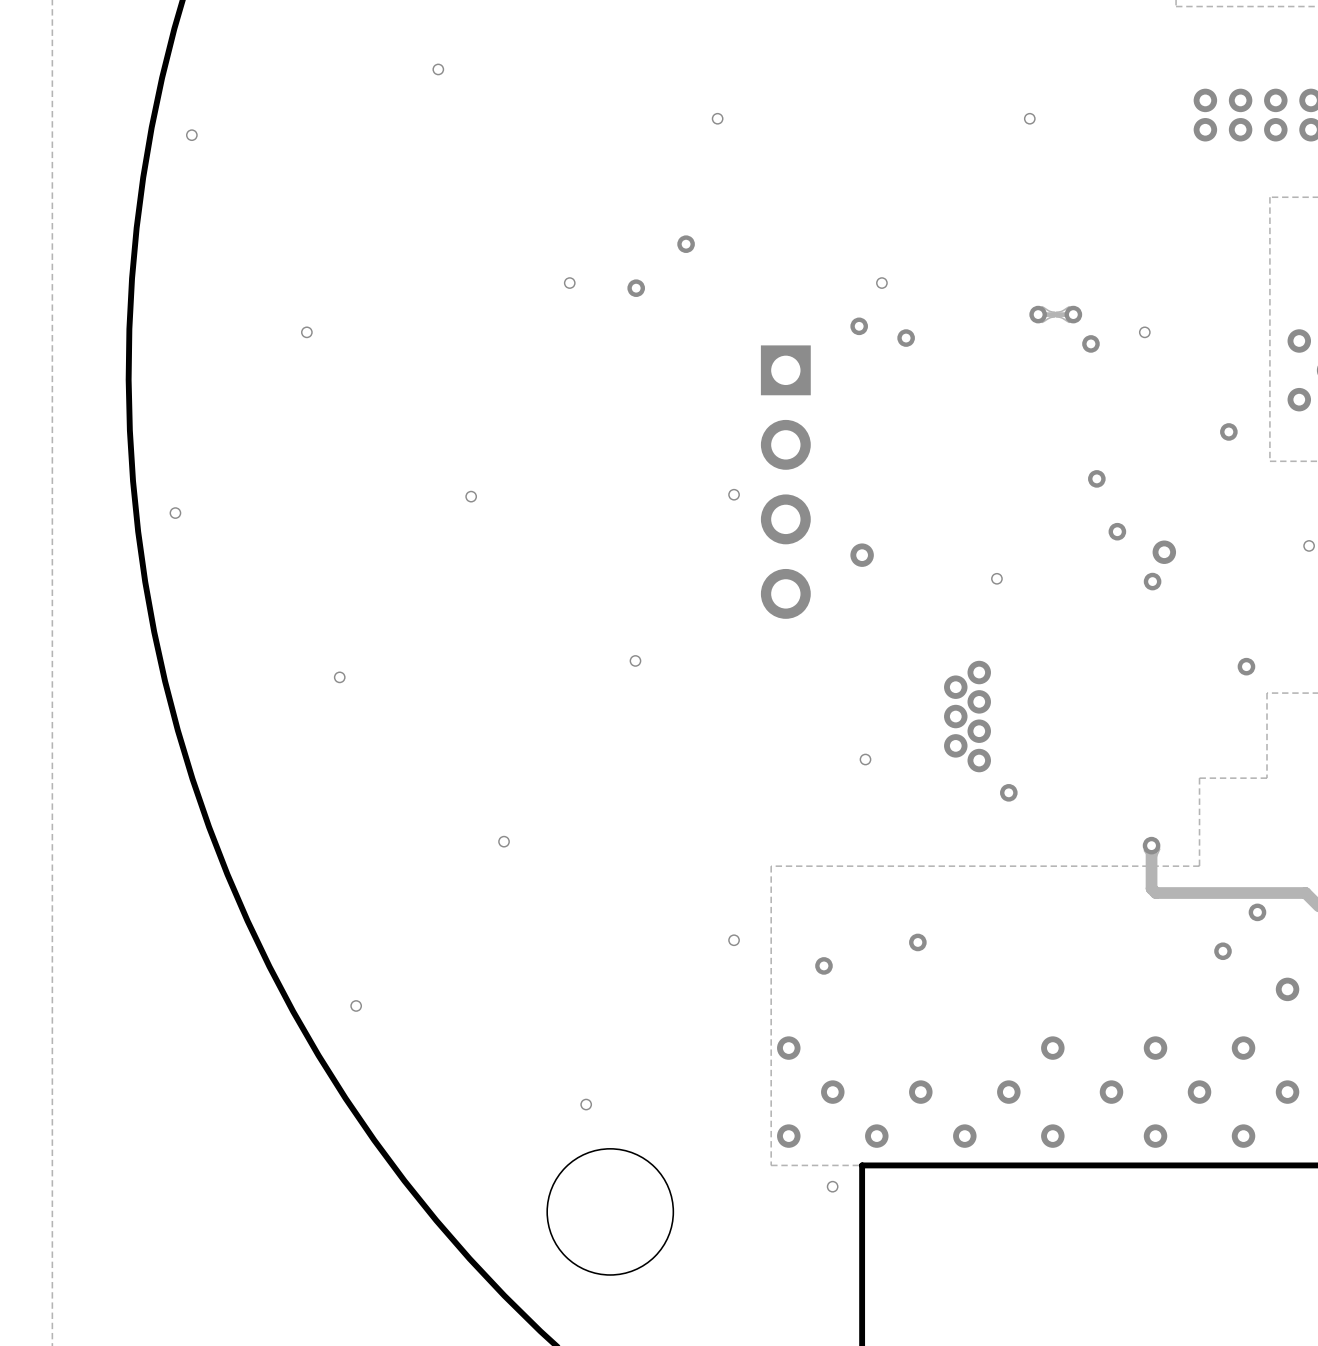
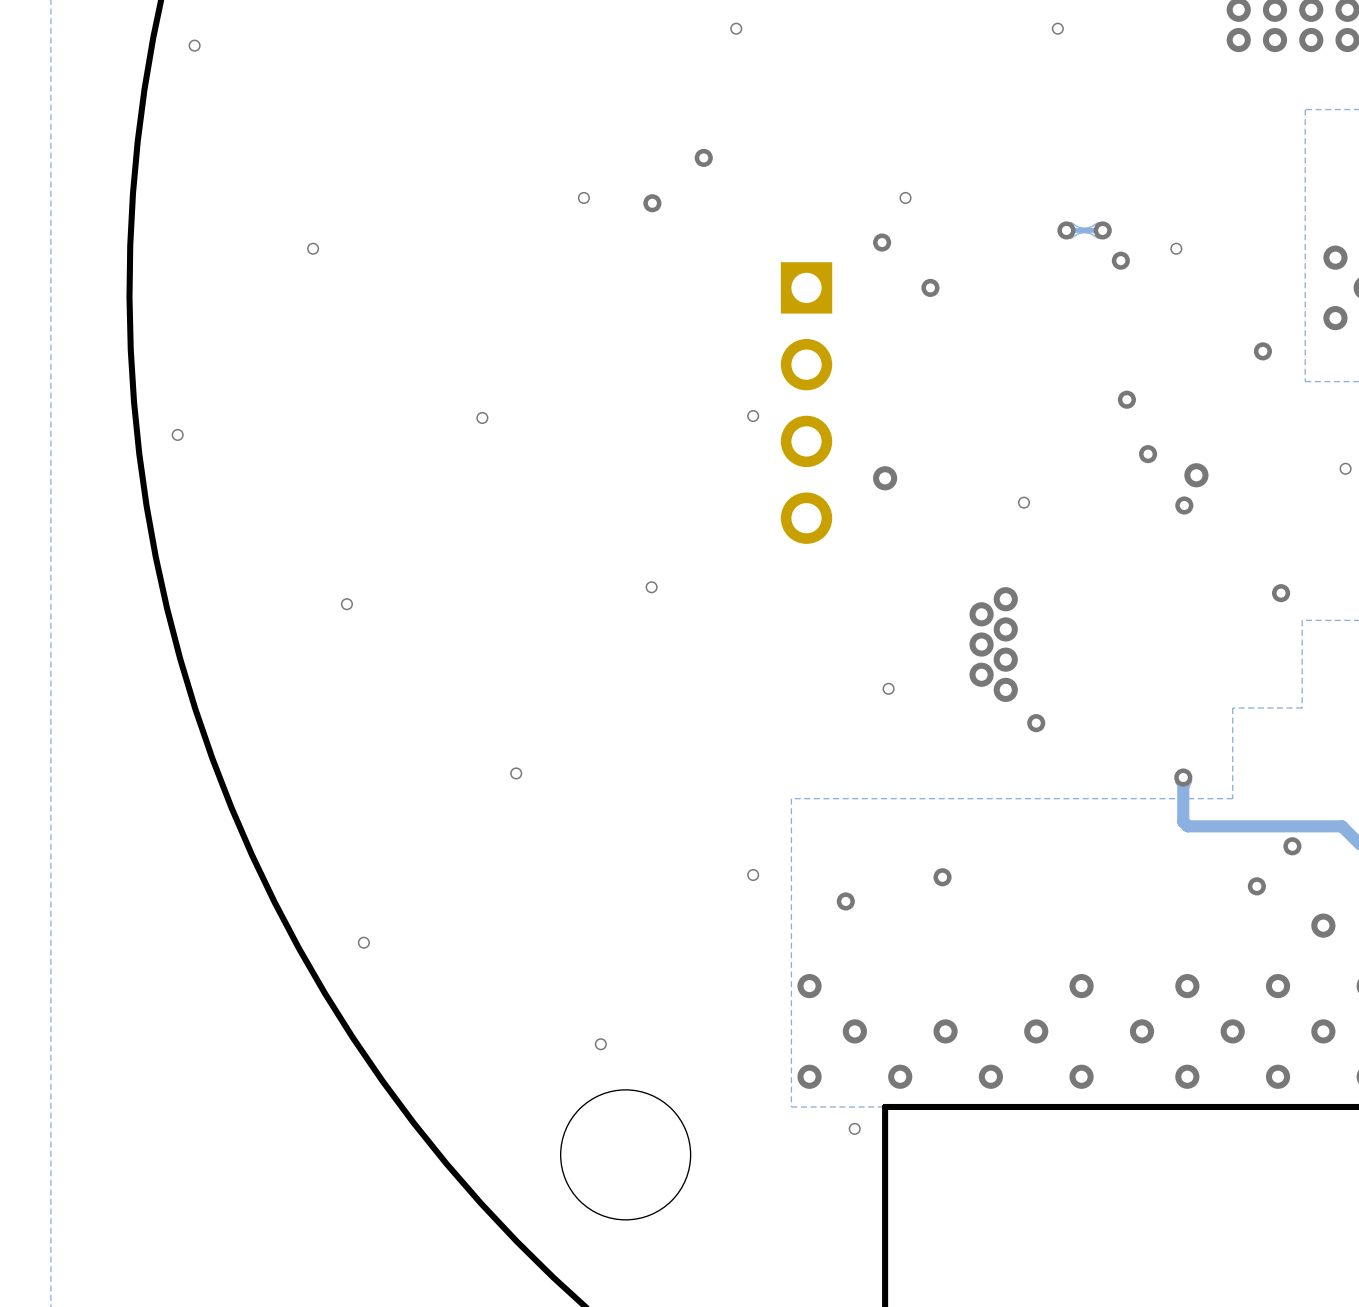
via position: (906, 338) -> (930, 287)

